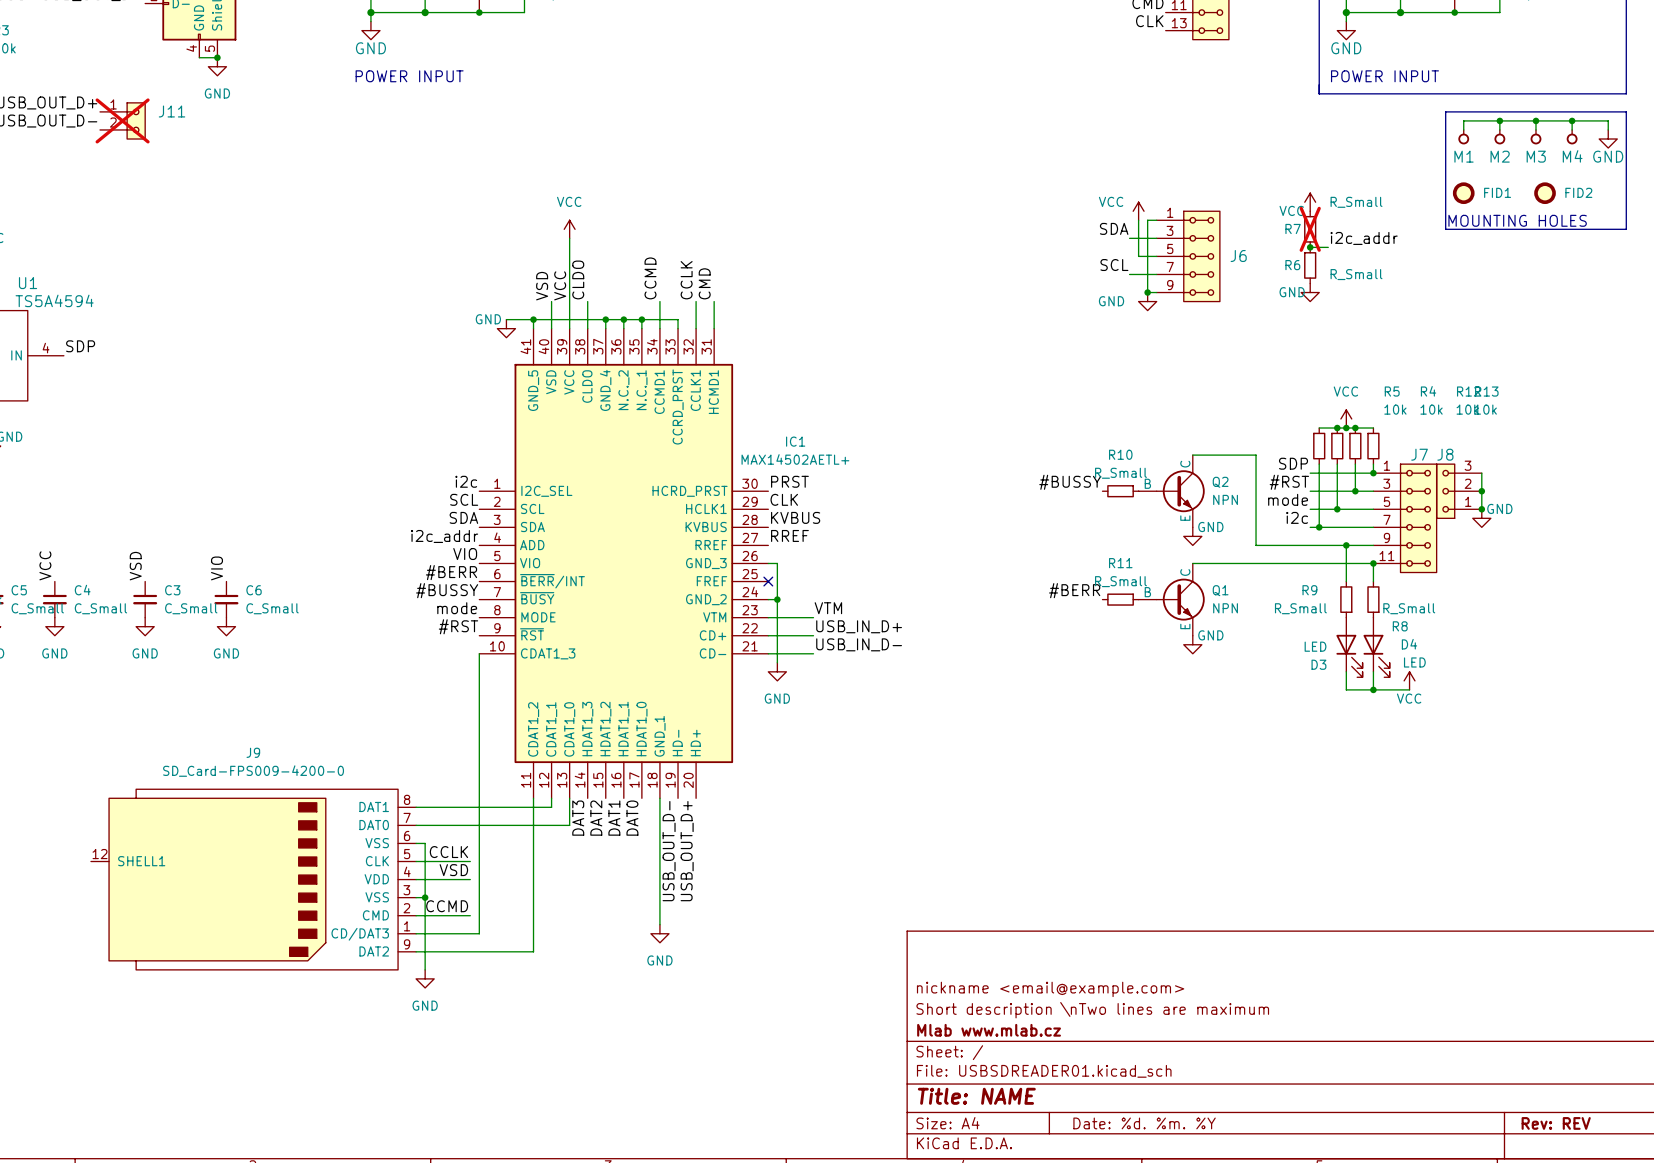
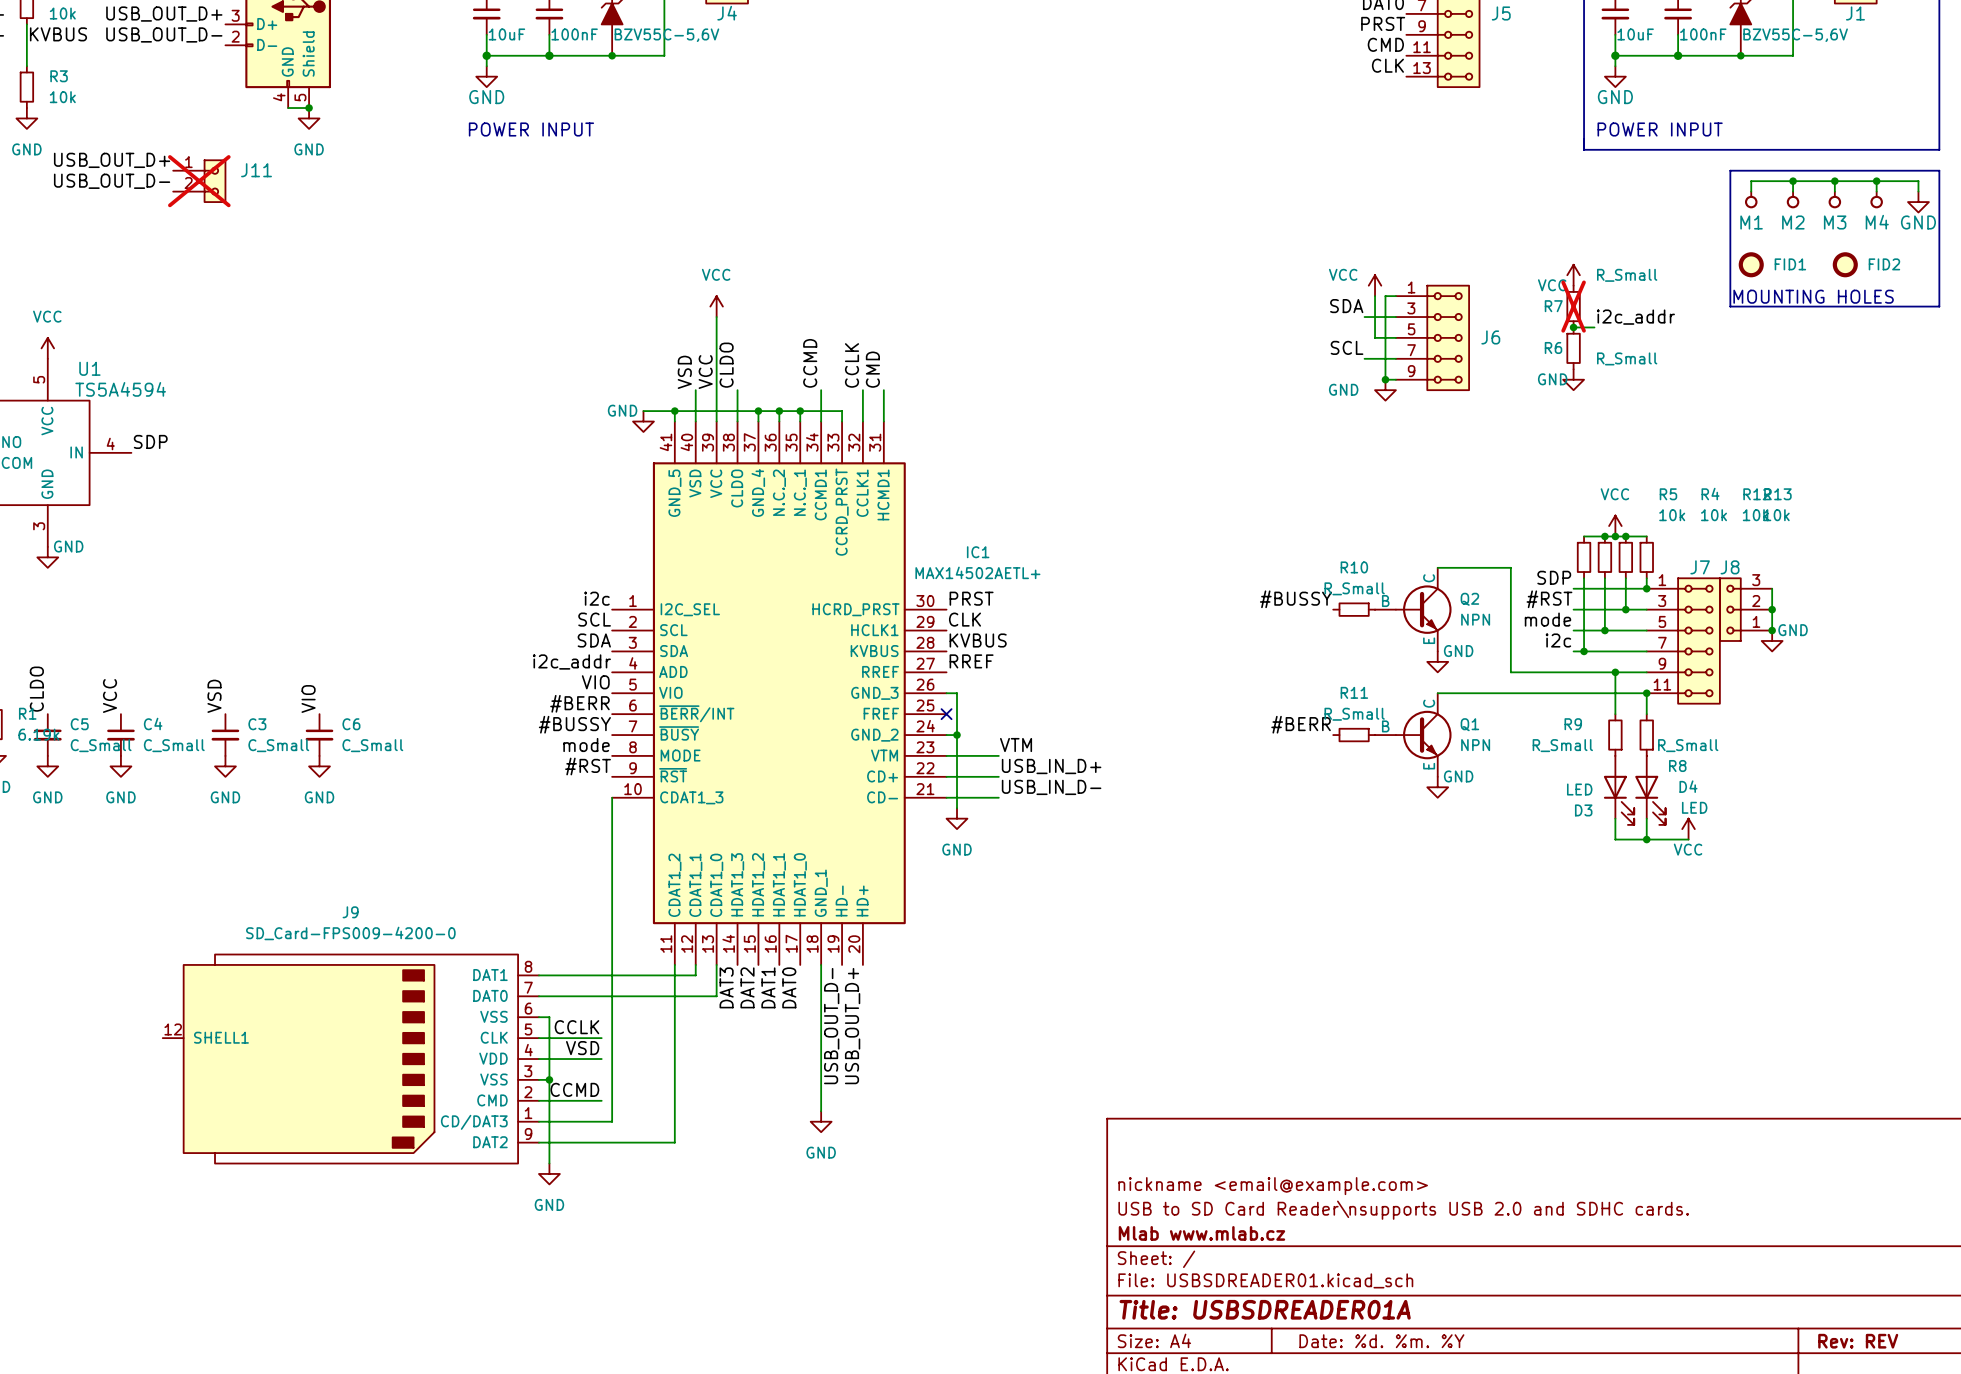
title block: Short description \nTwo lines are maximum (1092, 1010) -> USB to SD Card Reader\nsupports USB 2.0 and SDHC cards. (1403, 1210)
title block: Title: NAME (976, 1096) -> Title: USBSDREADER01A (1265, 1309)

